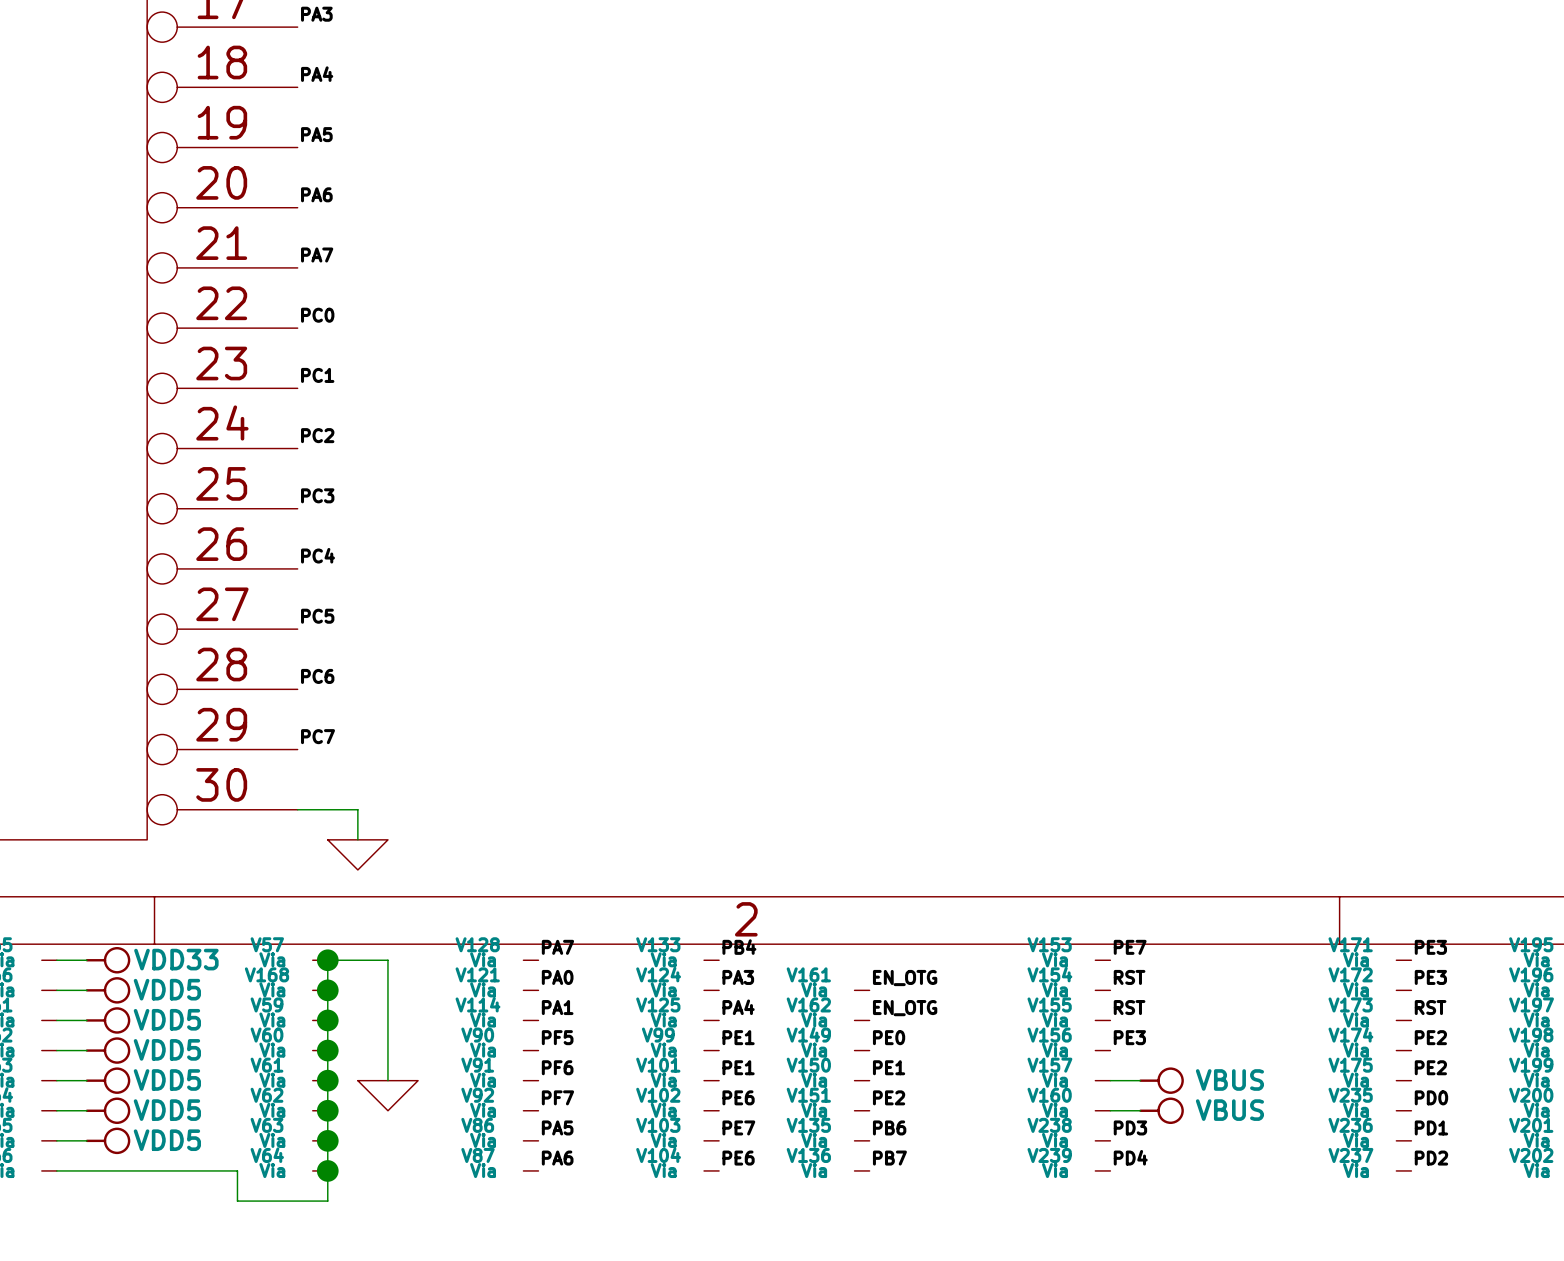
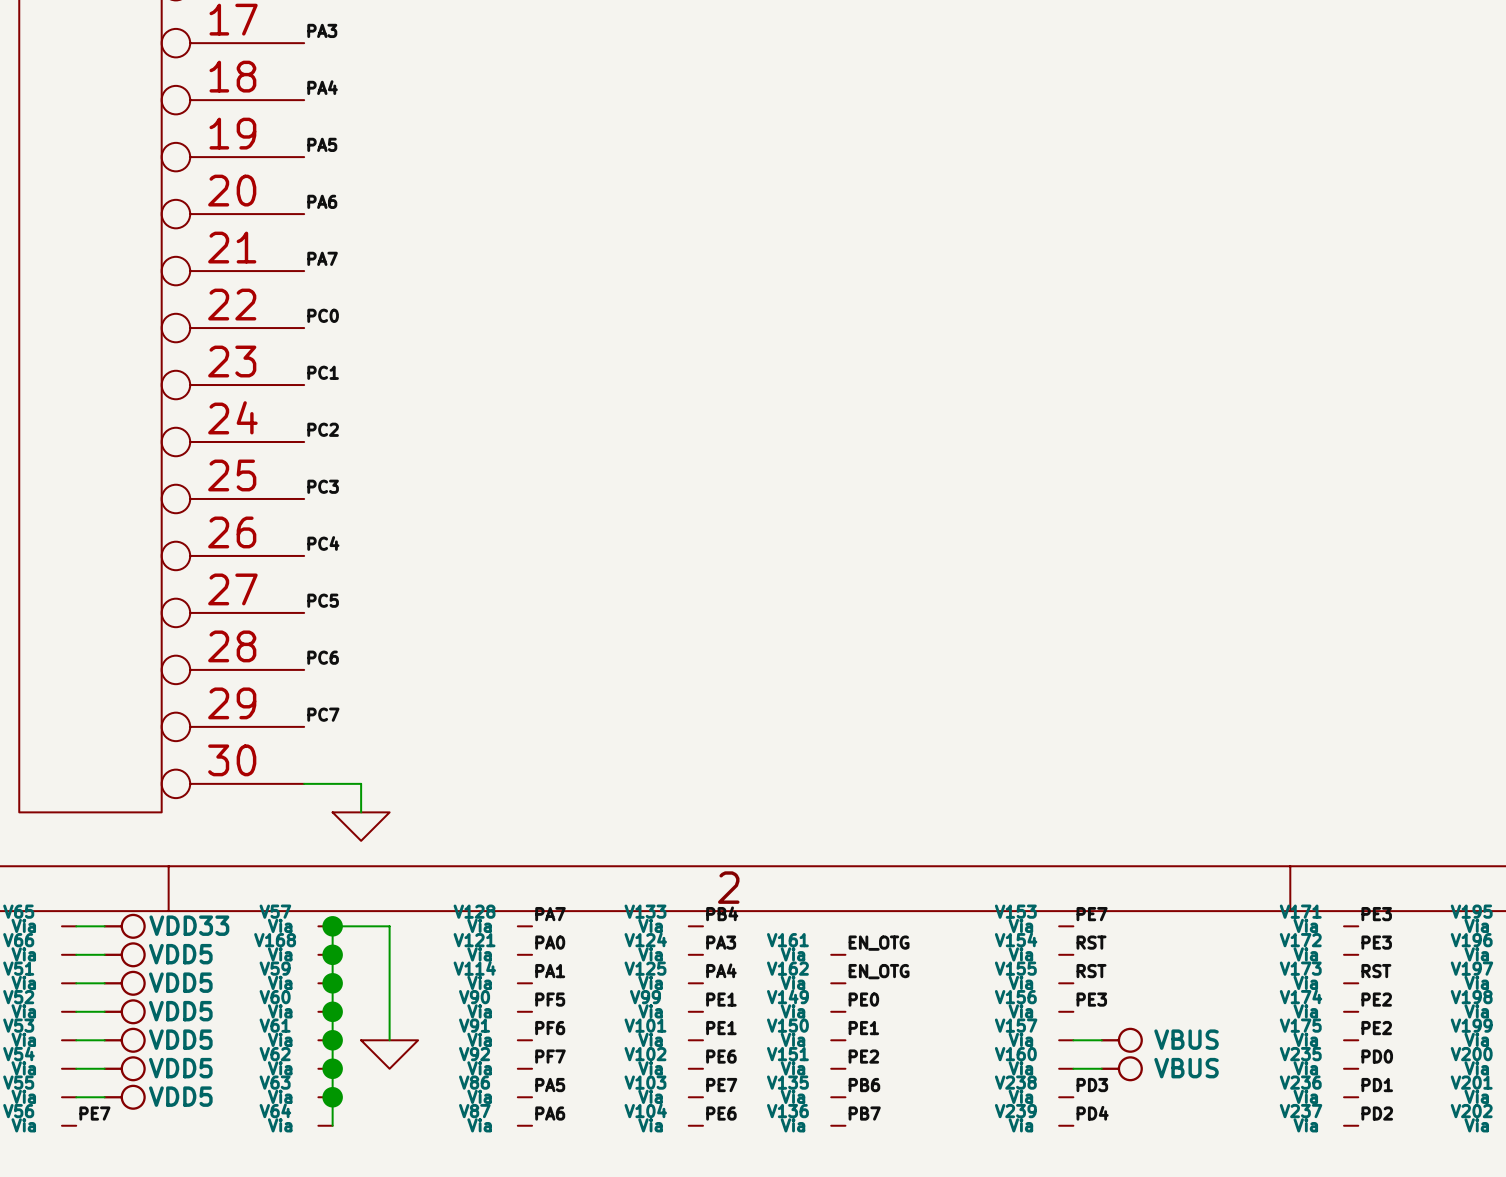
label: none -> PE7 (94, 1113)
wire: (56, 1170) (237, 1170) (237, 1201) (327, 1201) (327, 1170) -> none
junction: (327, 1170) -> none

